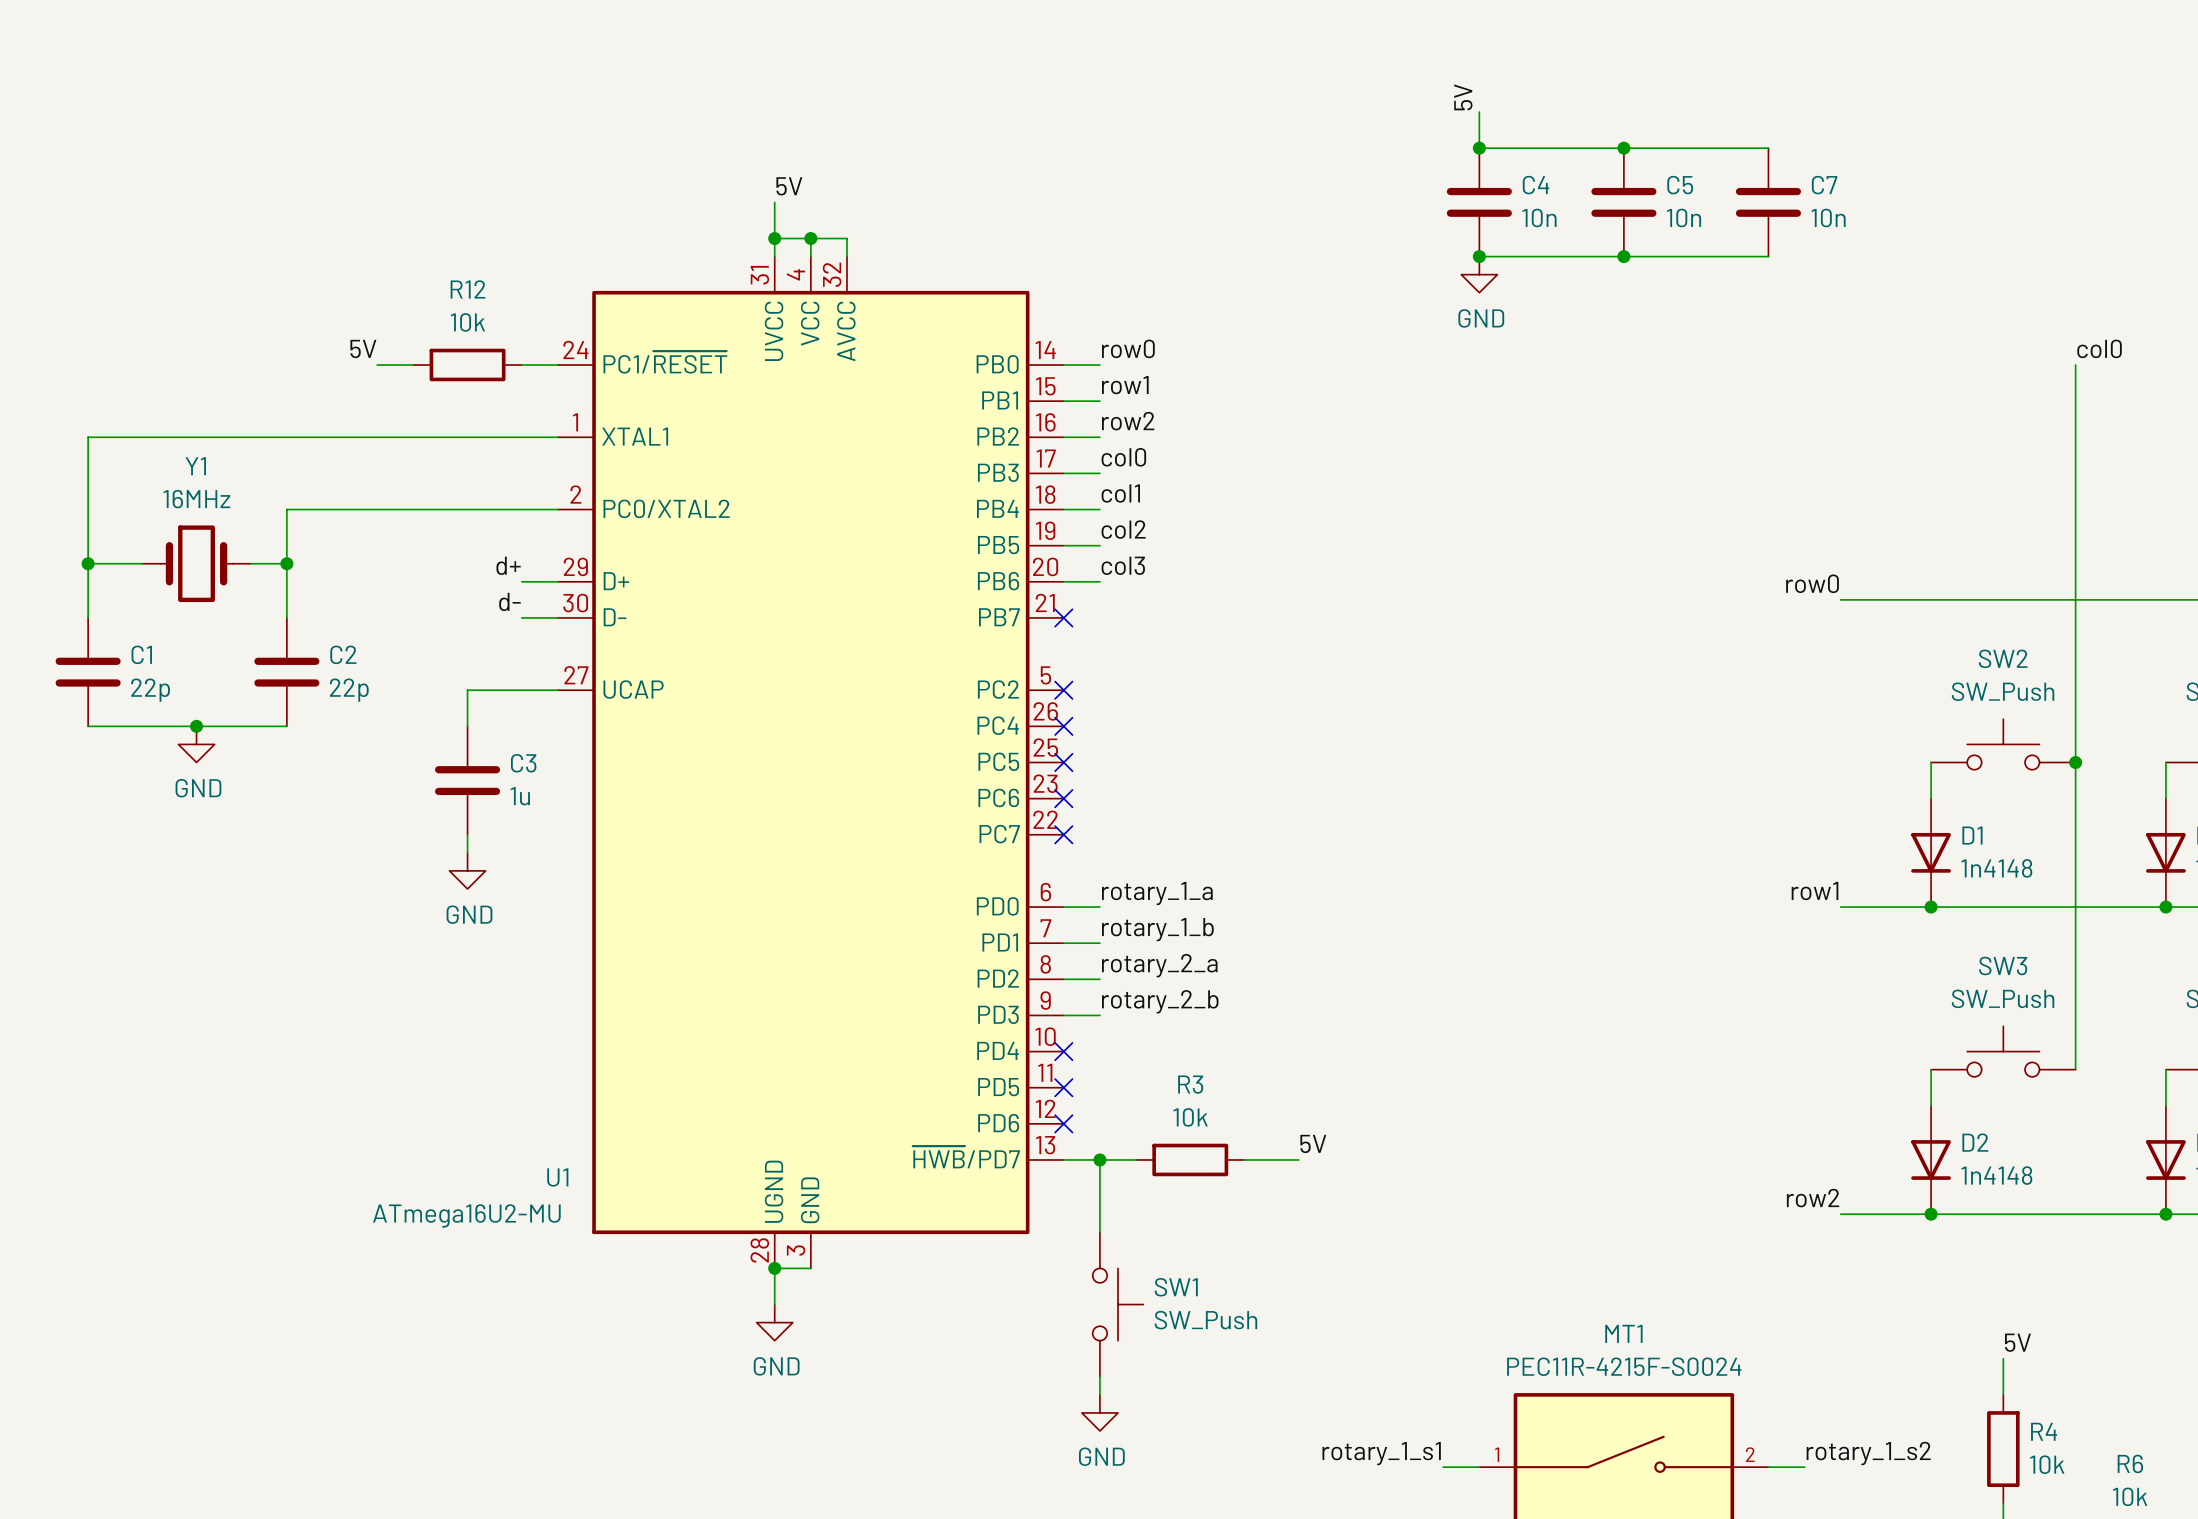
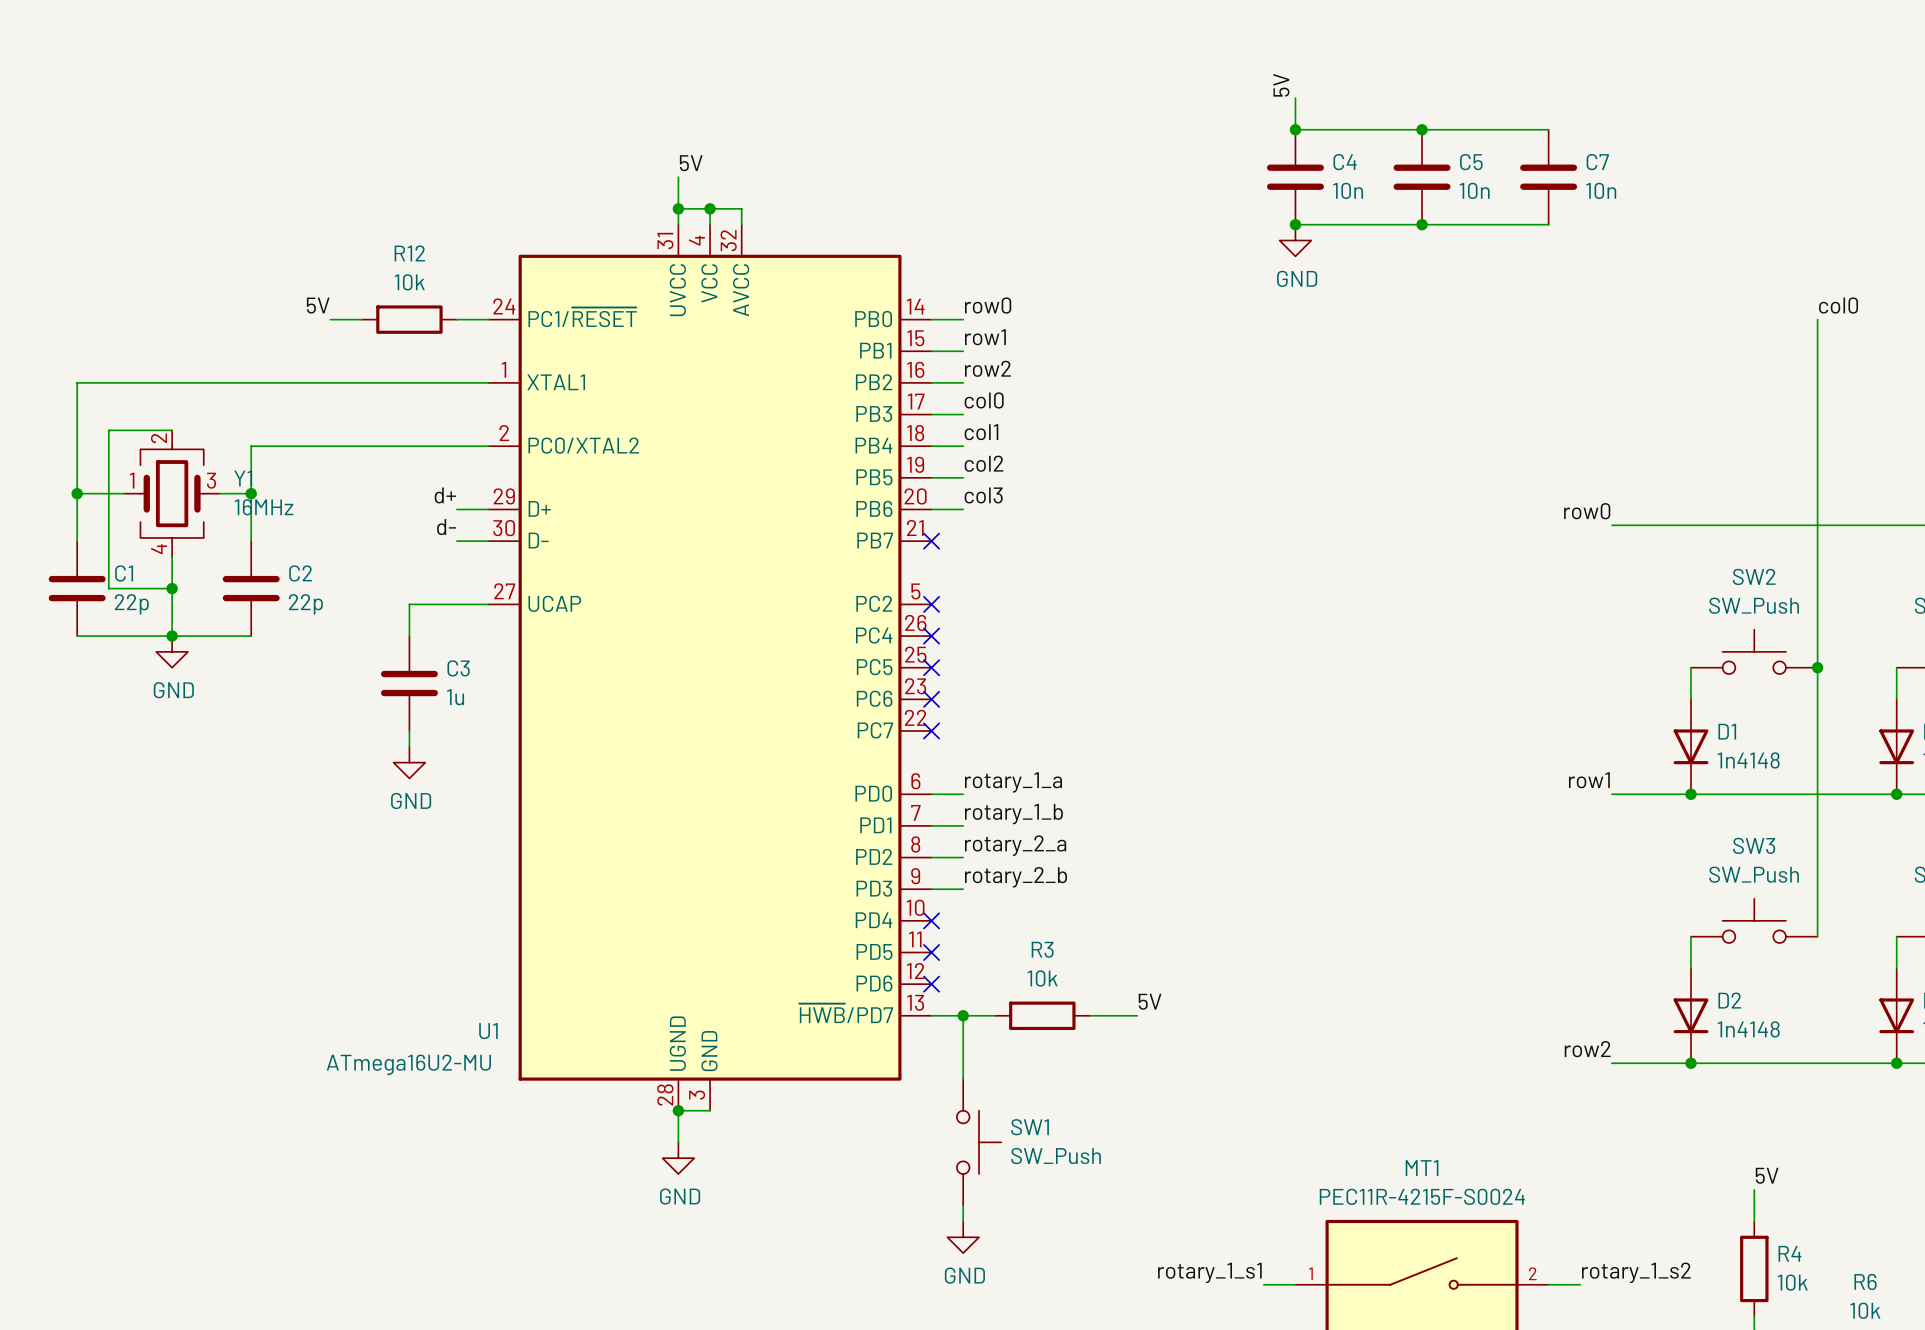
Y1 name position: Y1 (195, 466) -> Y1 (243, 478)
wire: none -> (172, 430) (108, 430) (108, 588) (172, 588)
Y1 value position: 16MHz (196, 499) -> 16MHz (264, 507)
Y1 symbol: [142, 525, 251, 603] -> [124, 430, 220, 557]
wire: none -> (172, 556) (172, 636)
junction: none -> (172, 588)

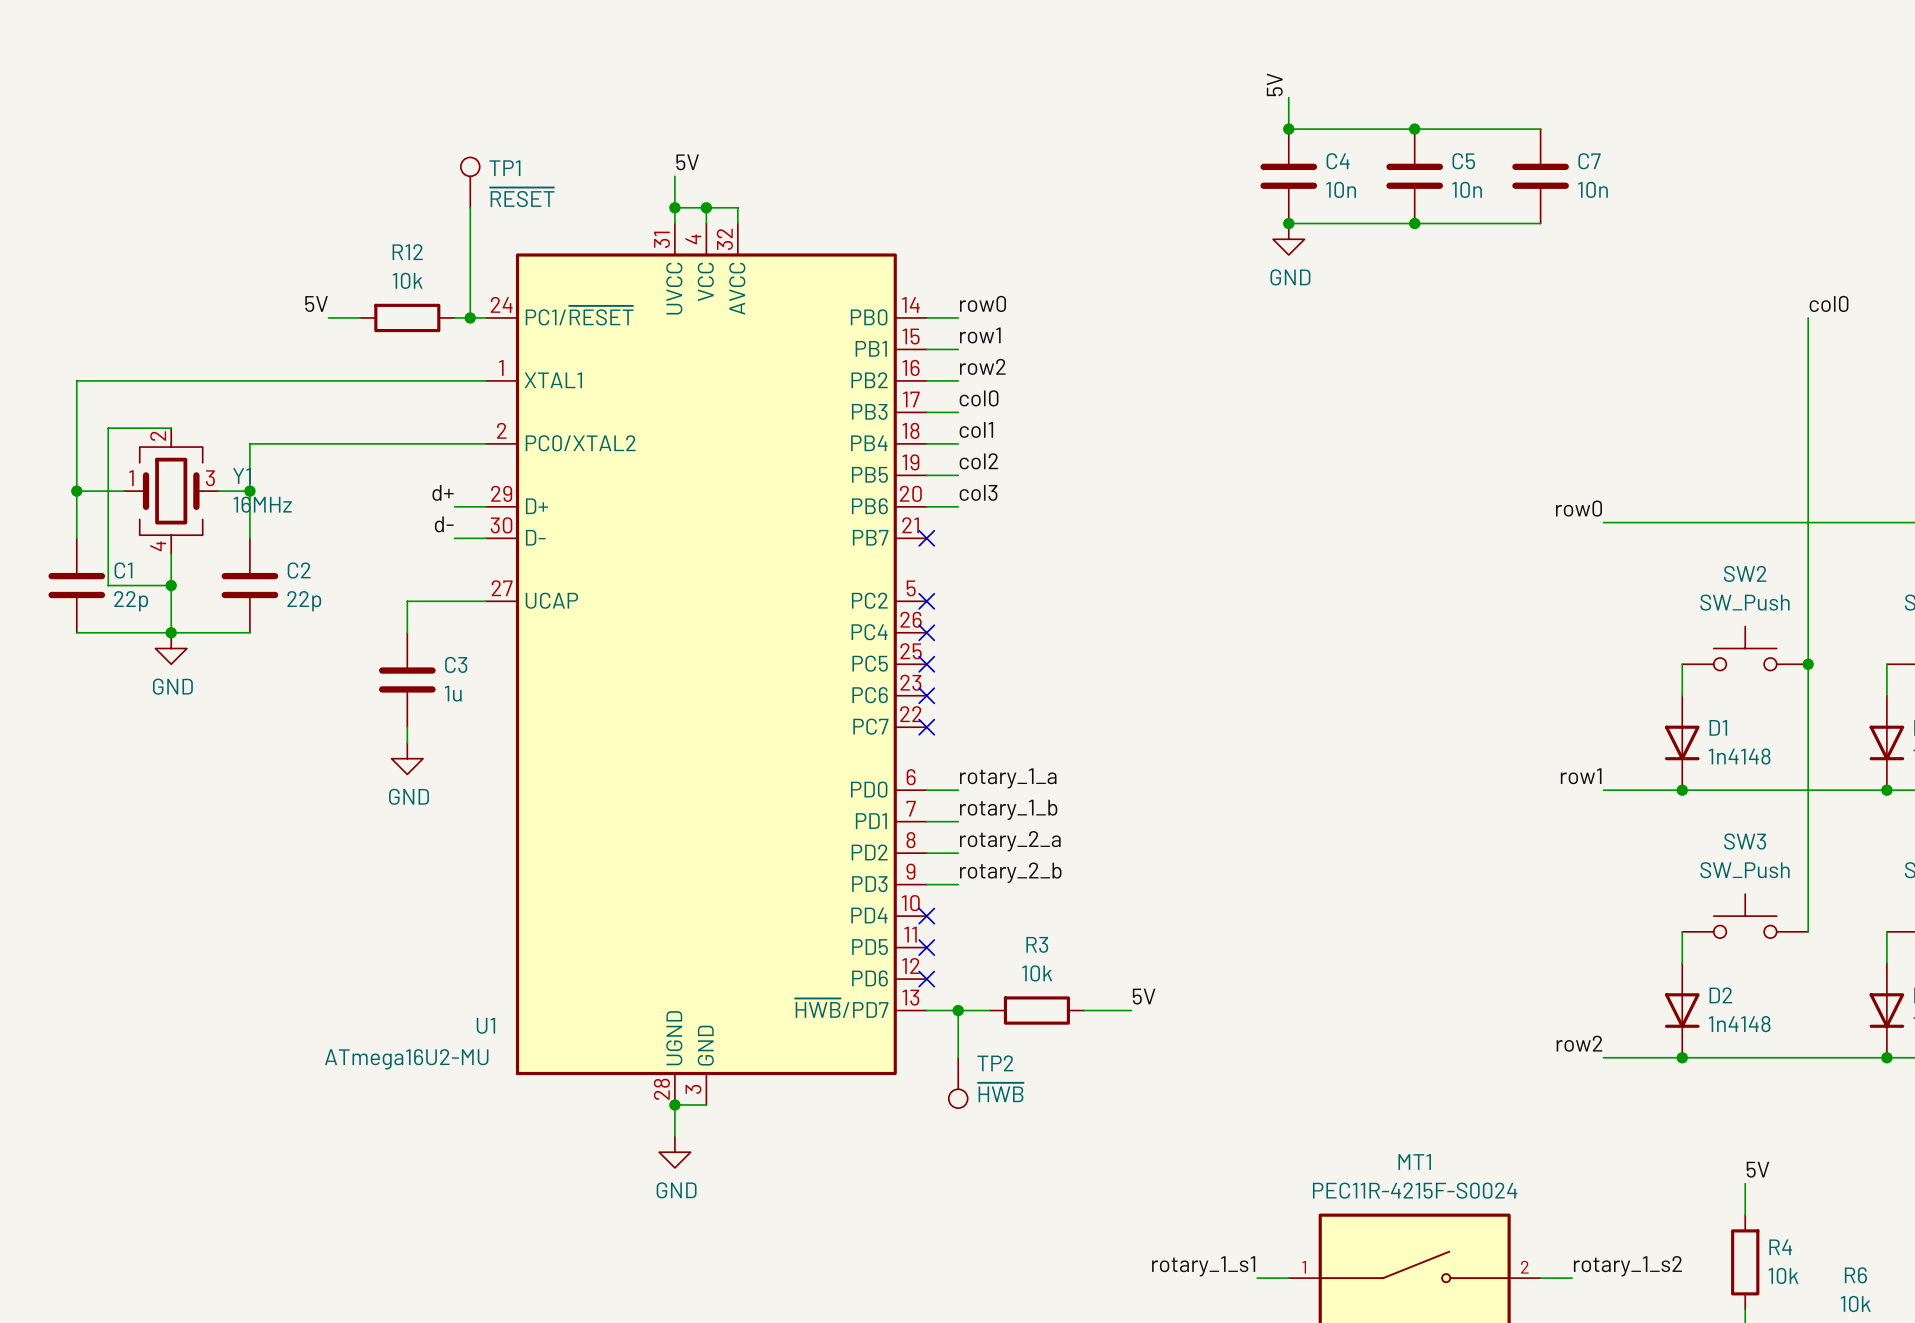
TP1: none -> ~{RESET} (470, 182)
wire: none -> (470, 207) (470, 317)
junction: none -> (470, 317)
TP2: none -> ~{HWB} (958, 1082)
SW1: SW_Push (979, 1142) -> none
wire: (963, 1205) (963, 1221) -> none
power symbol: GND (963, 1237) -> none

